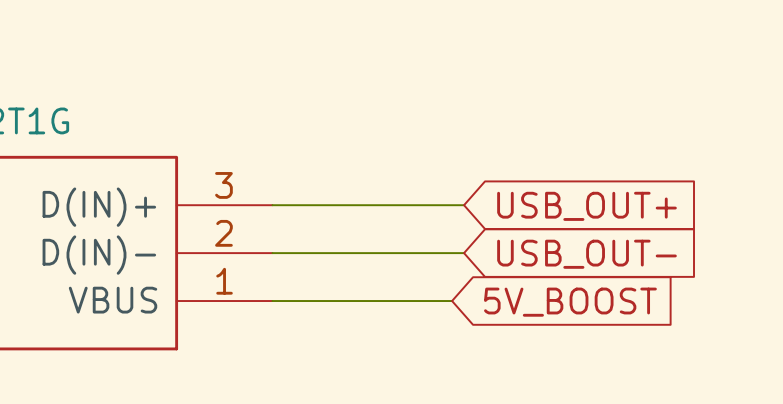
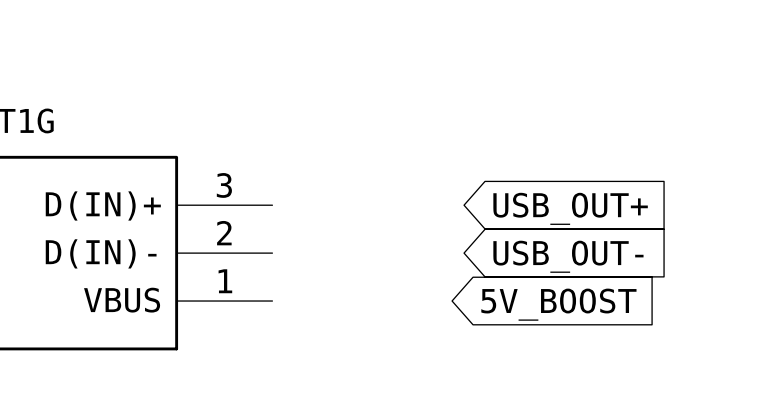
wire: (272, 205) (464, 205) -> none
wire: (272, 253) (464, 253) -> none
wire: (272, 301) (452, 301) -> none

